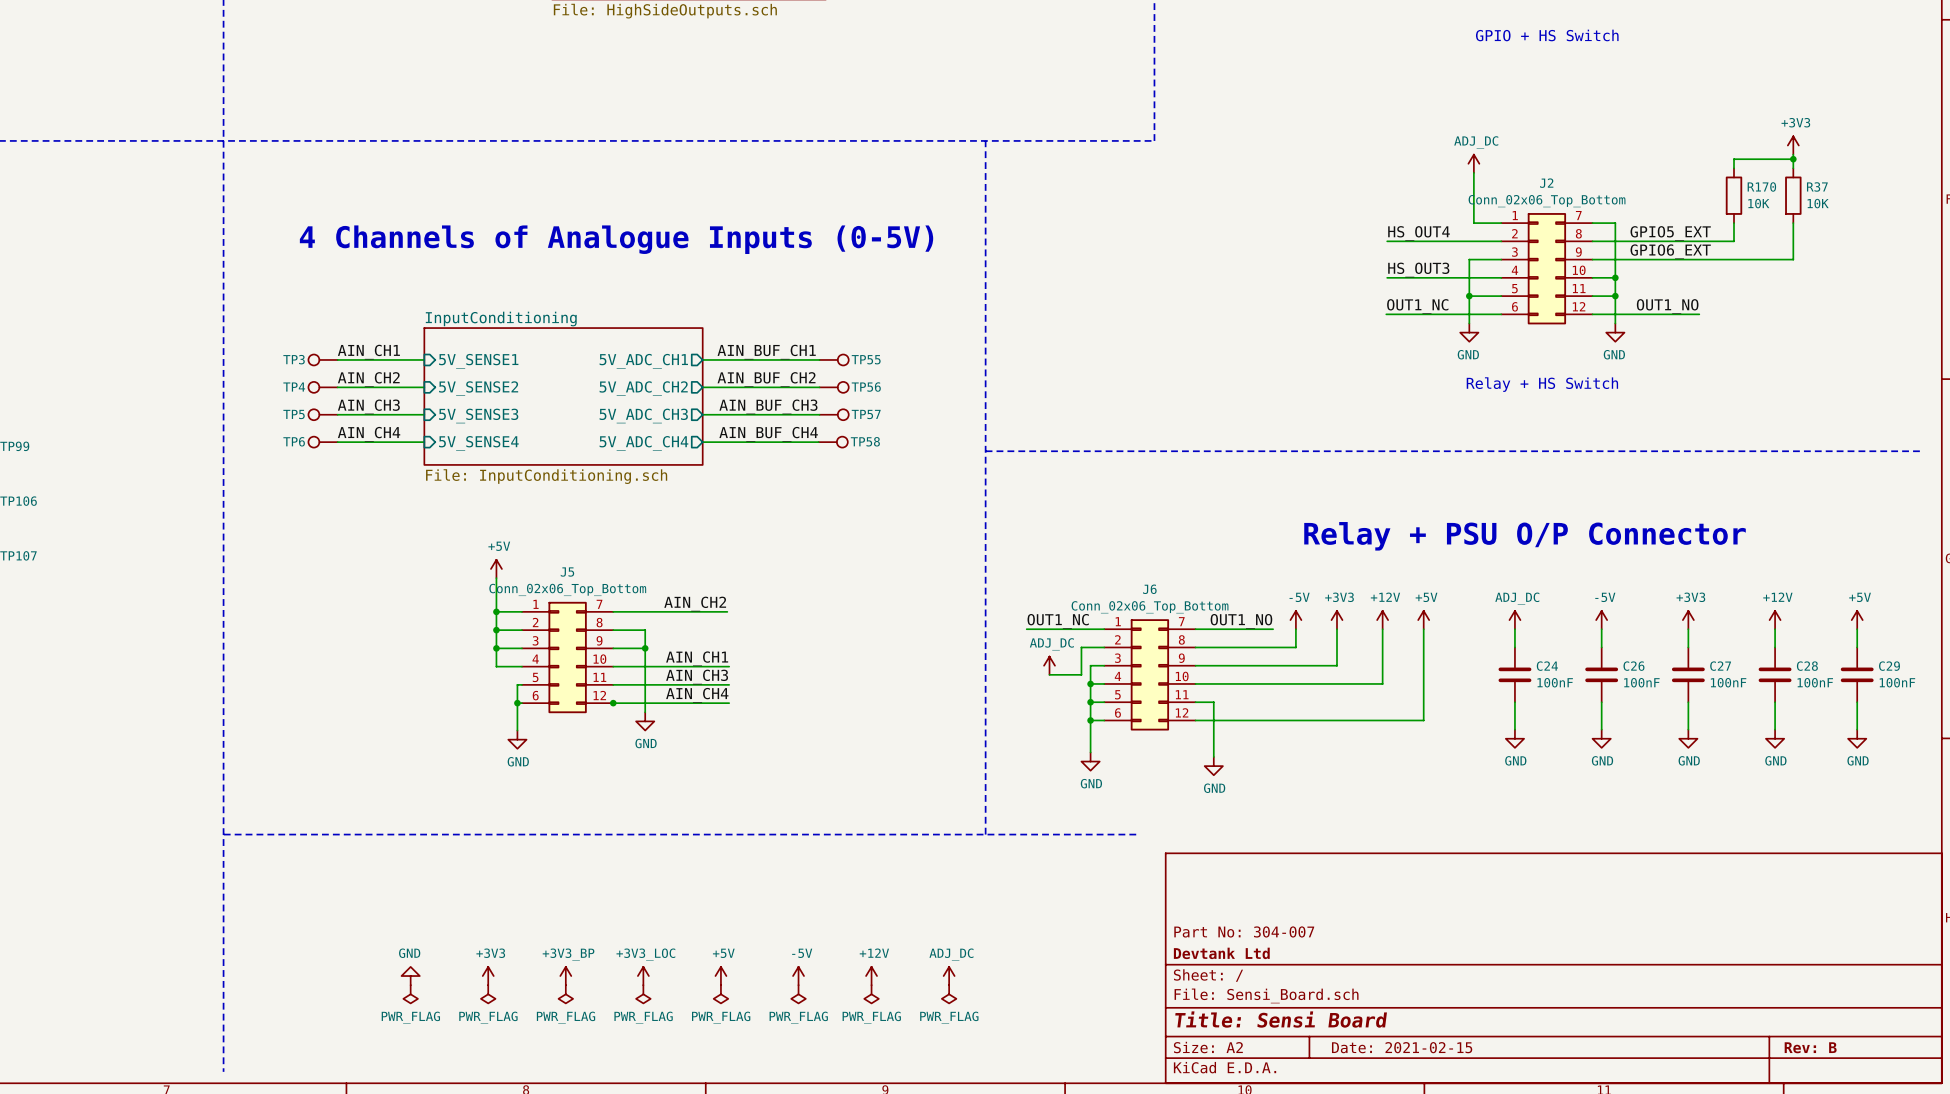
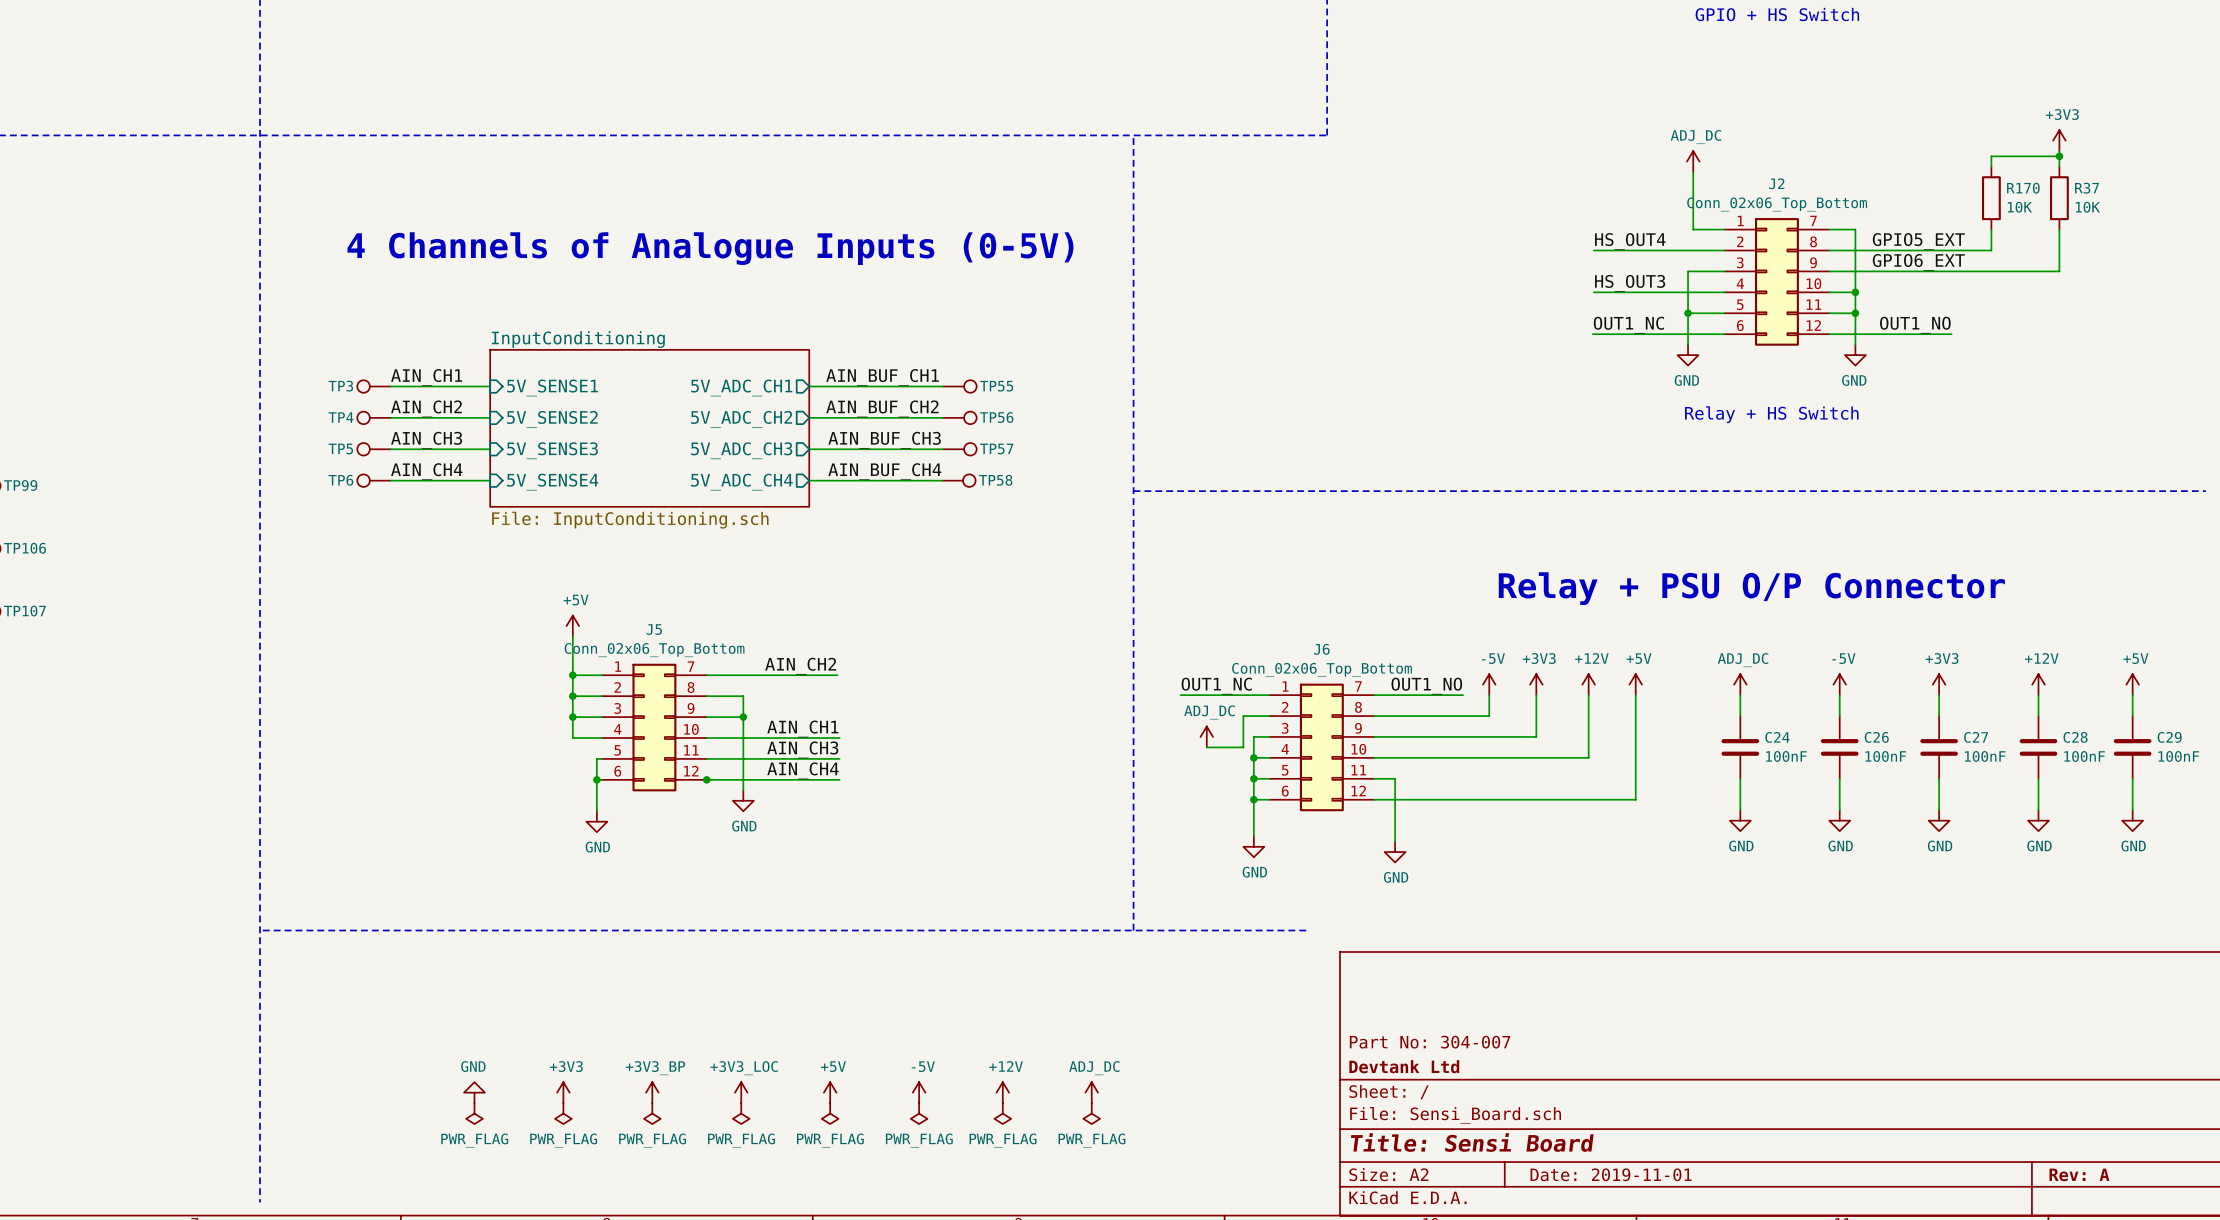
title block: Date: 2021-02-15 (1402, 1047) -> Date: 2019-11-01 (1611, 1174)
title block: Rev: B (1810, 1047) -> Rev: A (2079, 1174)

